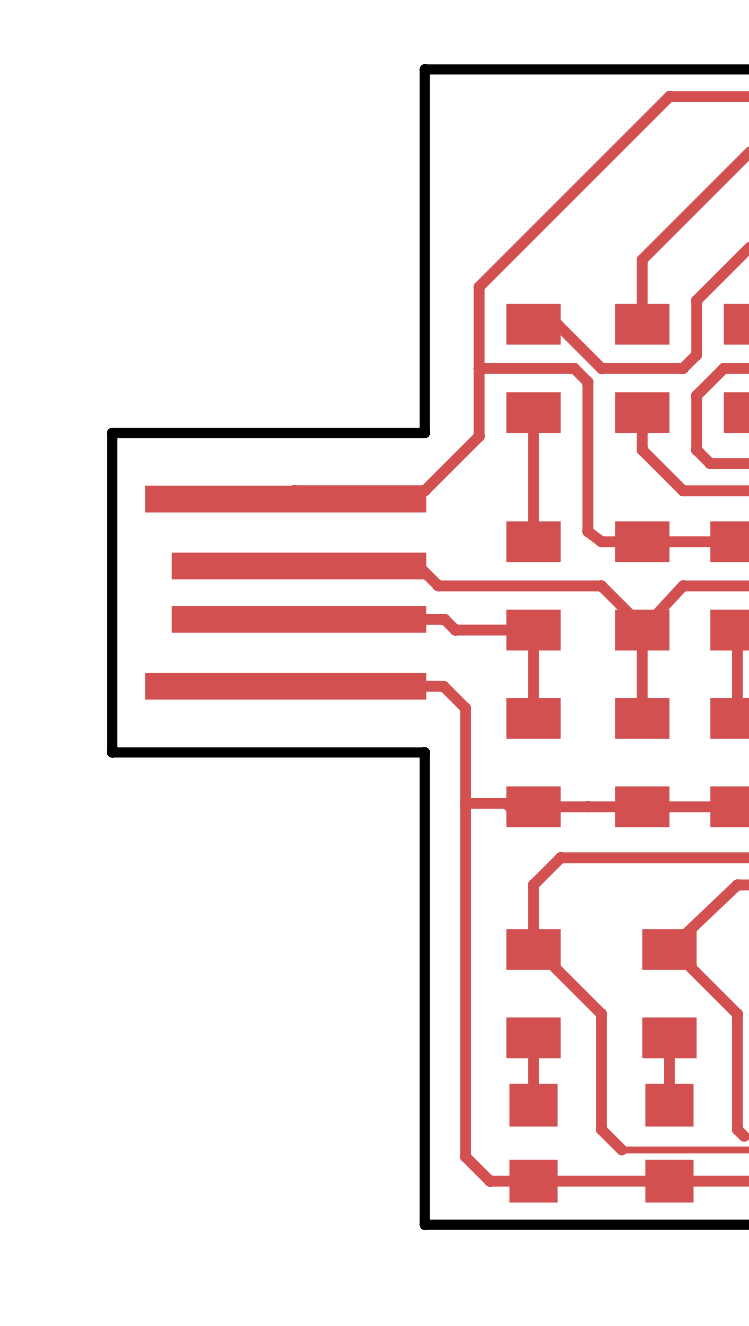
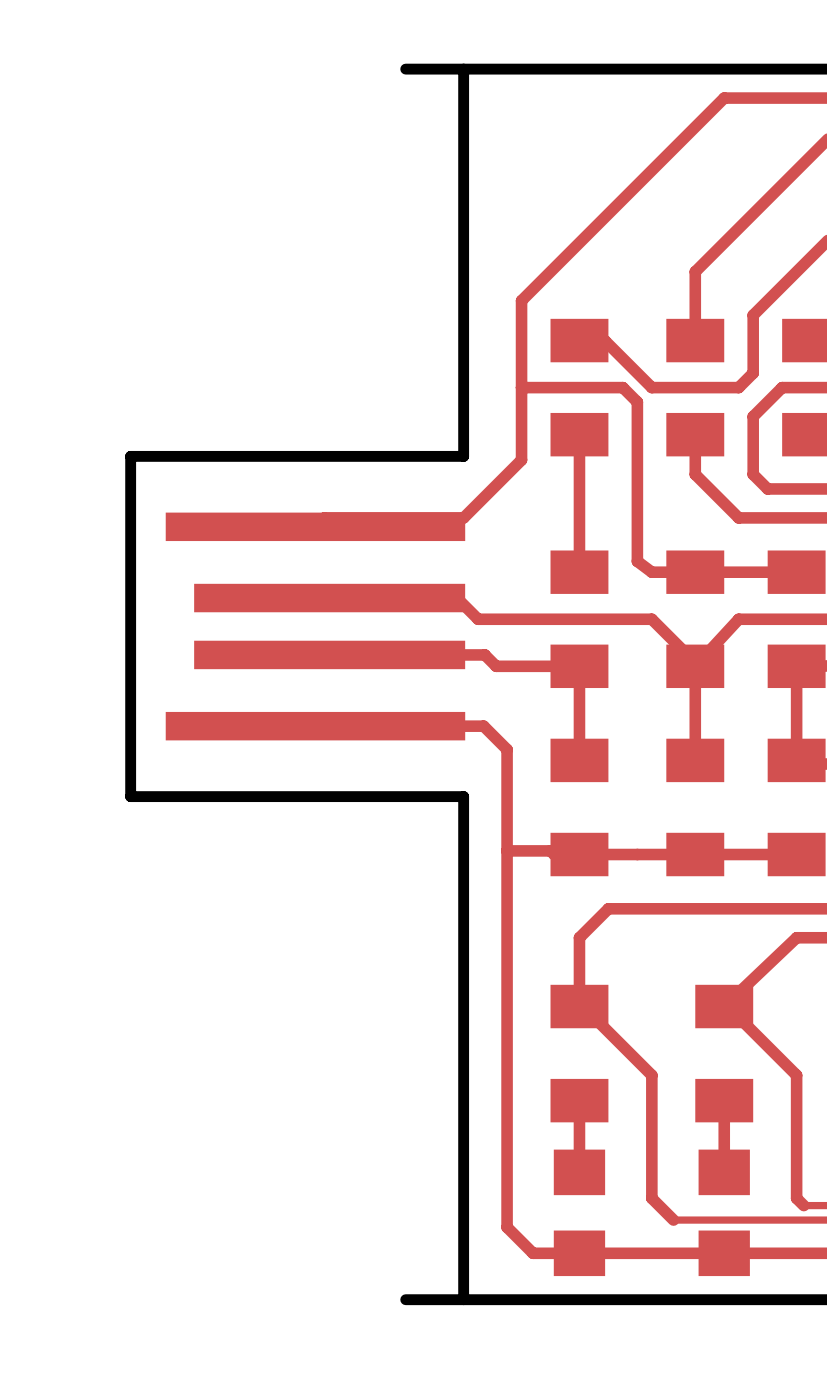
board edge: none -> (463, 69) (405, 69)
board edge: none -> (463, 1299) (405, 1299)

